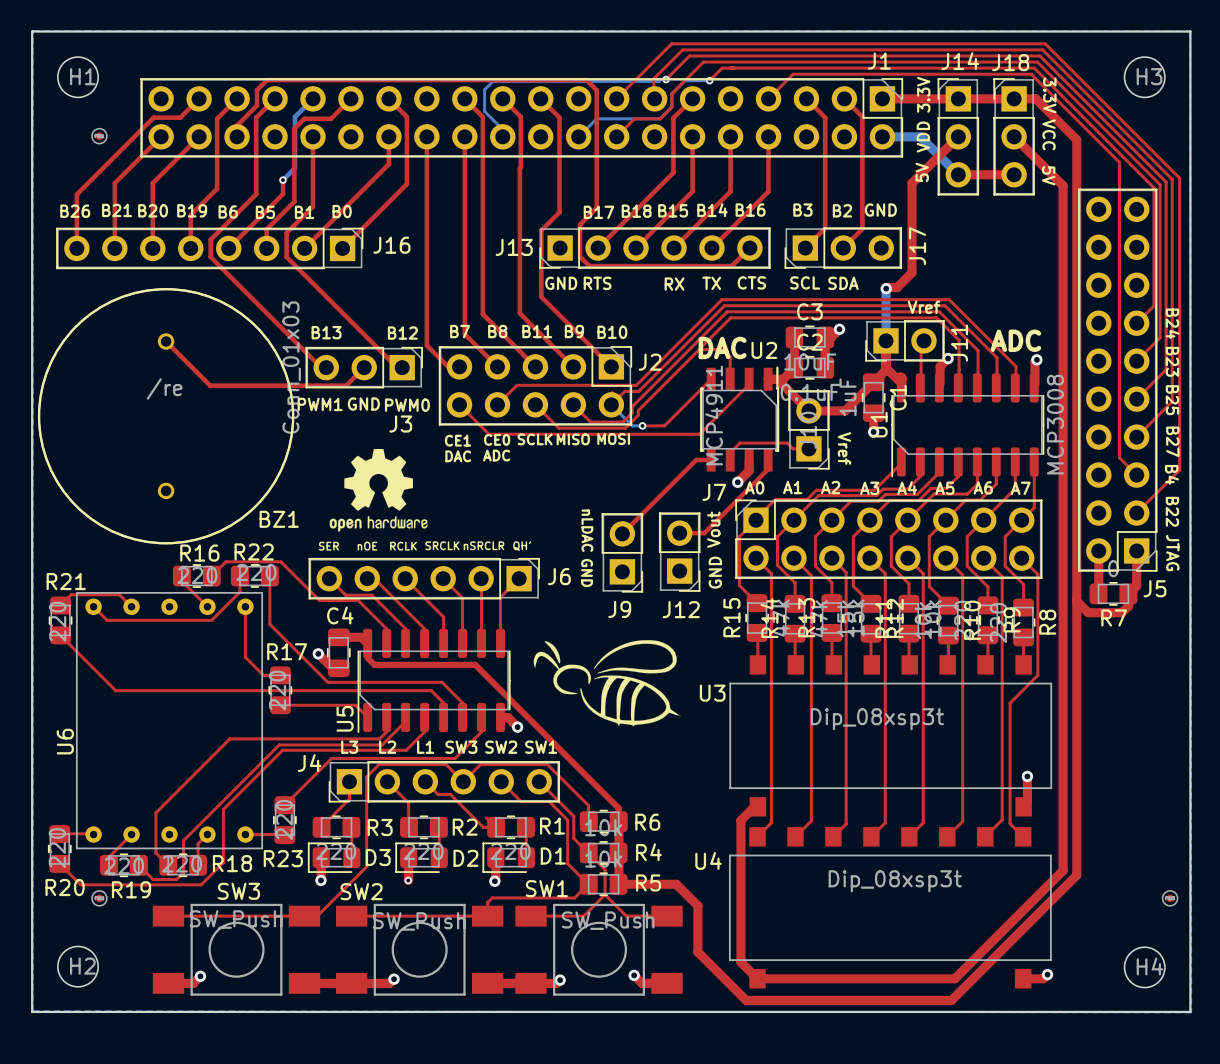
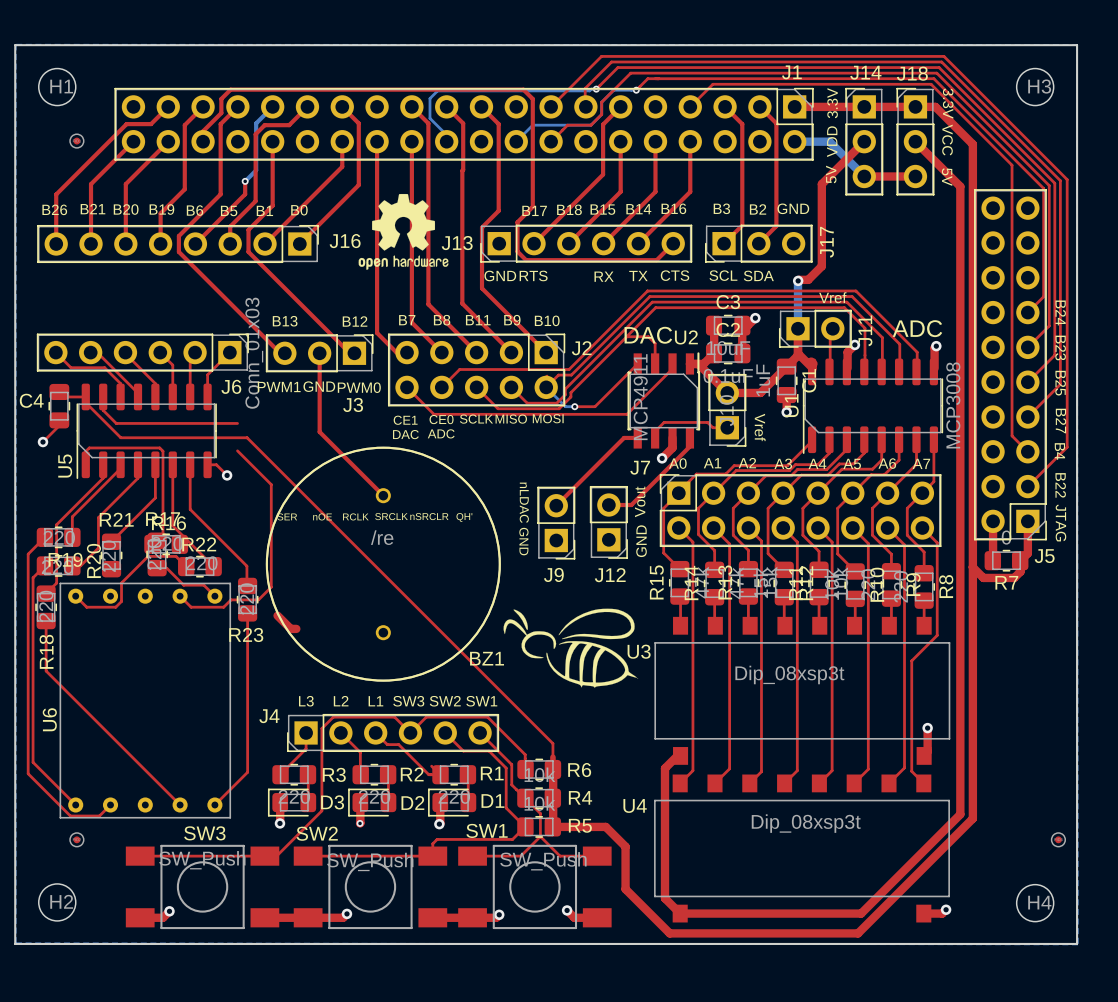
top track: (166, 341) (210, 385) (346, 385) (364, 367) -> (383, 495) (319, 431) (319, 353)
top track: none -> (55, 352) (70, 367) (104, 367) (120, 383) (120, 396)
top track: none -> (90, 352) (97, 352) (138, 393) (138, 396)
top track: none -> (125, 352) (155, 383) (155, 396)
top track: none -> (160, 352) (172, 365) (172, 396)
top track: none -> (195, 352) (190, 357) (190, 396)
top track: none -> (229, 352) (207, 374) (207, 396)
top track: none -> (103, 396) (103, 410) (116, 423) (237, 423)
BZ1 position: (166, 416) -> (383, 564)
top track: none -> (59, 420) (59, 425) (42, 442)
via: none -> (42, 442)
top track: none -> (237, 450) (271, 484) (271, 587) (258, 599) (231, 599) (223, 607) (191, 607) (180, 596)
top track: none -> (85, 464) (85, 451) (89, 447) (159, 447) (162, 451) (162, 534) (157, 540)
top track: none -> (103, 464) (103, 478) (56, 524) (56, 583) (46, 593)
top track: none -> (120, 464) (120, 468) (72, 516) (72, 537)
top track: none -> (138, 464) (138, 478) (98, 517) (98, 548) (80, 565) (72, 565)
top track: none -> (155, 464) (155, 497) (111, 541)
top track: none -> (172, 464) (172, 525) (213, 566)
top track: none -> (190, 464) (190, 509) (246, 566) (247, 585)
top track: none -> (207, 464) (216, 464) (227, 475)
drawing position: (378, 490) -> (403, 231)
via: none -> (227, 475)
top track: none -> (44, 537) (28, 554) (28, 773) (70, 816) (99, 816) (110, 805)
top track: (181, 576) (181, 581) (207, 606) -> none
top track: (211, 576) (226, 561) (280, 561) (319, 600) (358, 600) (386, 628) (386, 643) -> none
top track: (239, 576) (239, 592) (211, 620) (107, 620) (93, 606) -> none
R22 position: (254, 576) -> (199, 566)
top track: (269, 576) (269, 624) (327, 682) (442, 682) (462, 702) (462, 717) -> none
J6 name position: J6 (559, 576) -> J6 (231, 386)
top track: (329, 578) (345, 595) (371, 595) (405, 628) (405, 643) -> none
top track: (367, 578) (374, 578) (424, 628) (424, 643) -> none
top track: (405, 578) (443, 617) (443, 643) -> none
J6 position: (424, 578) -> (142, 352)
top track: (443, 578) (462, 598) (462, 643) -> none
top track: (481, 578) (481, 643) -> none
top track: (519, 578) (500, 597) (500, 643) -> none
top track: none -> (44, 565) (33, 577) (33, 762) (75, 805)
top track: none -> (186, 566) (176, 556) (148, 556) (121, 583) (121, 601) (115, 607) (86, 607) (75, 596)
top track: none -> (157, 568) (166, 568) (183, 585) (203, 585) (214, 596)
top track: (60, 605) (71, 594) (119, 594) (131, 606) -> none
top track: (245, 606) (245, 657) (263, 675) (280, 675) -> none
C4 name position: C4 (340, 615) -> C4 (31, 400)
R21 position: (60, 620) -> (111, 555)
top track: (60, 635) (115, 690) (431, 690) (443, 702) (443, 717) -> none
top track: (338, 637) (361, 637) (367, 643) (367, 658) (374, 664) (475, 664) (618, 808) -> (59, 391) (64, 396) (85, 396) (85, 402) (120, 437) (247, 437) (552, 743) (552, 757)
top track: none -> (247, 613) (247, 772) (214, 805)
C4 position: (338, 652) -> (59, 406)
via: (318, 653) -> none
top track: none -> (46, 621) (46, 671) (180, 805)
U5 position: (434, 680) -> (146, 431)
drawing position: (607, 683) -> (570, 648)
R17 position: (280, 690) -> (157, 554)
top track: (280, 705) (355, 705) (367, 717) -> none
top track: (386, 717) (386, 731) (379, 738) (229, 738) (155, 812) (155, 853) (168, 865) -> none
top track: (405, 717) (405, 721) (382, 744) (279, 744) (183, 840) (183, 872) (176, 879) (153, 879) (138, 865) -> none
top track: (424, 717) (424, 731) (406, 750) (282, 750) (223, 809) (223, 862) (201, 884) (80, 884) (59, 863) -> none
top track: (481, 717) (481, 731) (455, 758) (331, 758) (284, 805) -> none
top track: (500, 717) (507, 717) (517, 727) -> none
U6 position: (169, 720) -> (145, 700)
via: (517, 727) -> none
R23 position: (284, 820) -> (247, 599)
top track: (92, 833) (59, 834) -> none
top track: (131, 834) (109, 857) (109, 865) -> none
top track: (207, 834) (198, 843) (198, 865) -> none
top track: (245, 834) (284, 835) -> none
R20 rotation: 0° (59, 848) -> 90° clockwise (58, 565)
R20 position: (59, 848) -> (58, 565)
R19 position: (123, 865) -> (58, 537)
R18 rotation: 0° (183, 865) -> 90° clockwise (46, 607)
R18 position: (183, 865) -> (46, 607)
R20 name position: R20 (65, 887) -> R20 (93, 560)

